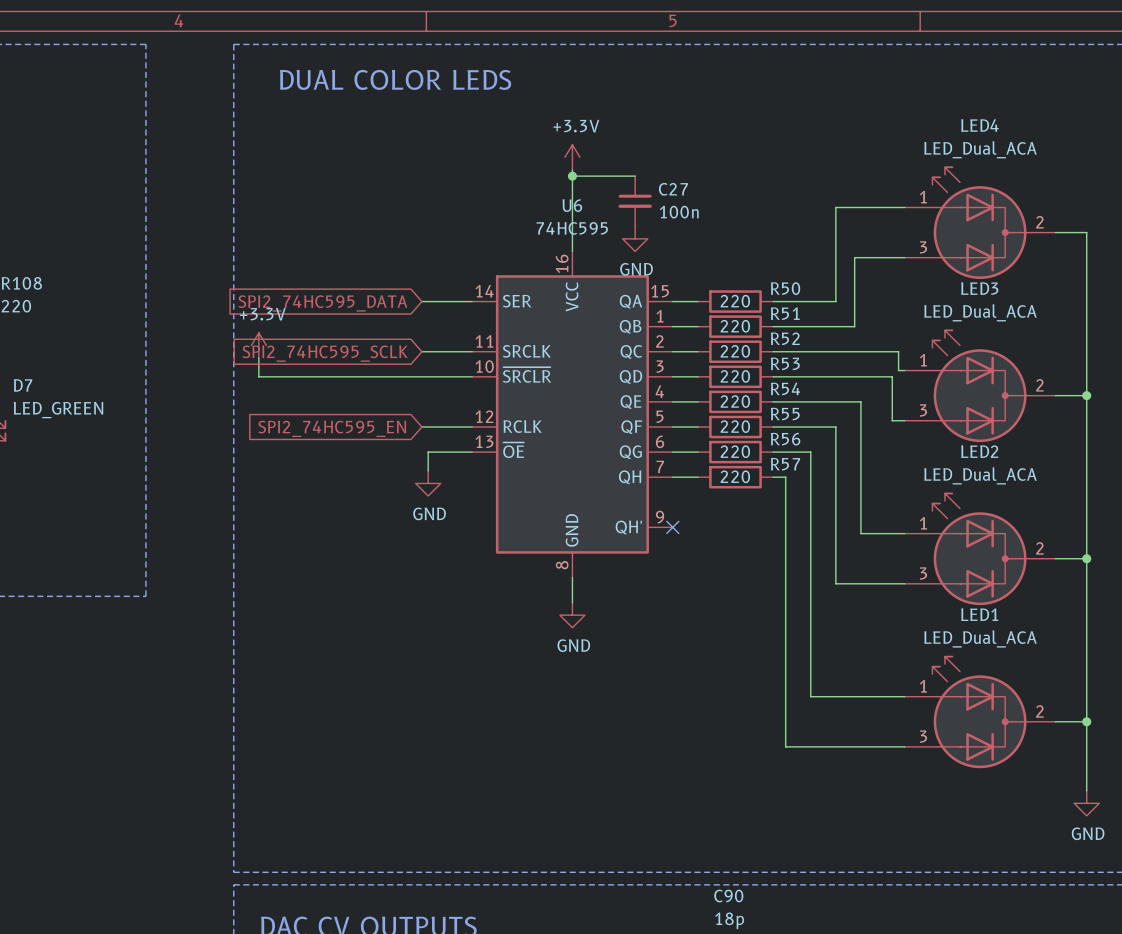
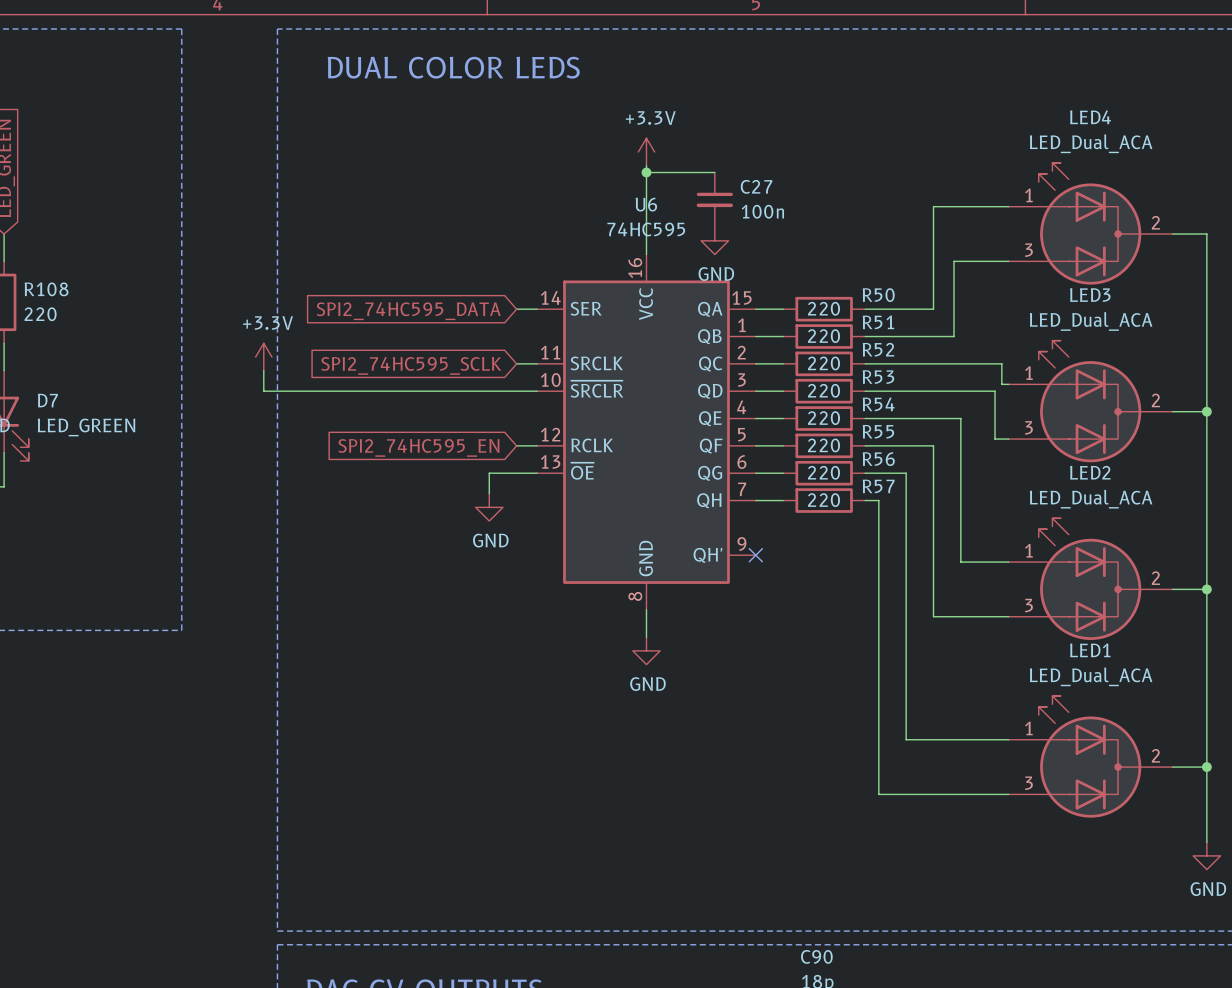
wire: (421, 301) (453, 301) -> none
global label position: SPI2_74HC595_DATA (322, 303) -> SPI2_74HC595_DATA (408, 311)
power symbol position: +3.3V (258, 345) -> +3.3V (263, 357)
wire: (421, 351) (453, 351) -> none
global label position: SPI2_74HC595_SCLK (325, 353) -> SPI2_74HC595_SCLK (411, 365)
wire: (258, 358) (258, 376) -> (263, 370) (263, 391) (304, 391)
wire: (421, 427) (453, 427) -> none
global label position: SPI2_74HC595_EN (332, 428) -> SPI2_74HC595_EN (418, 447)

